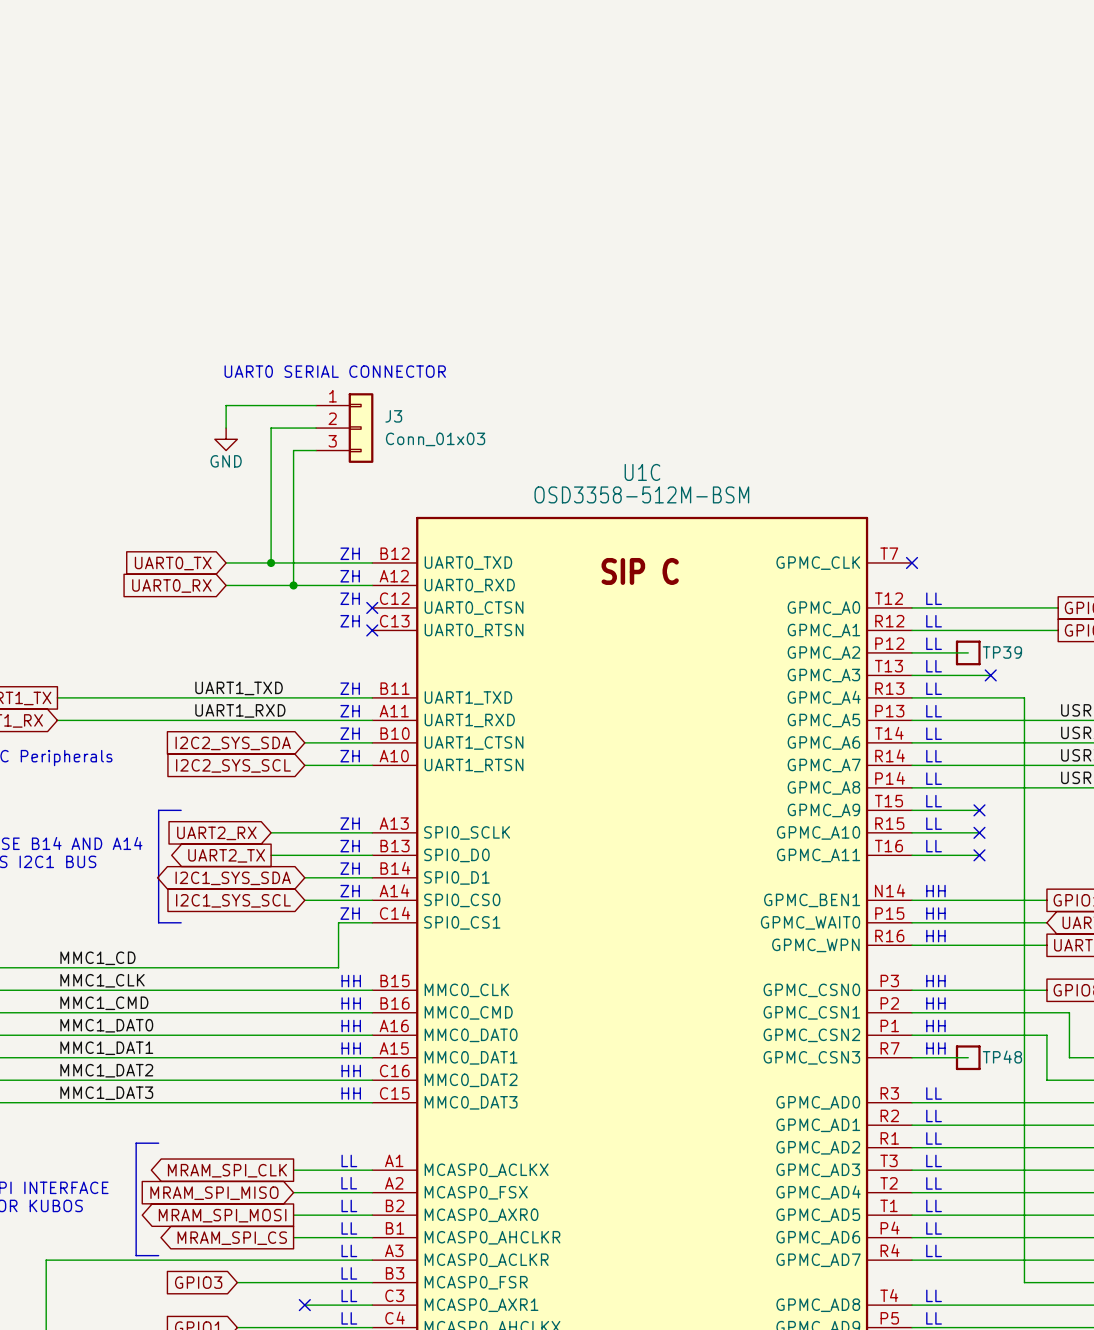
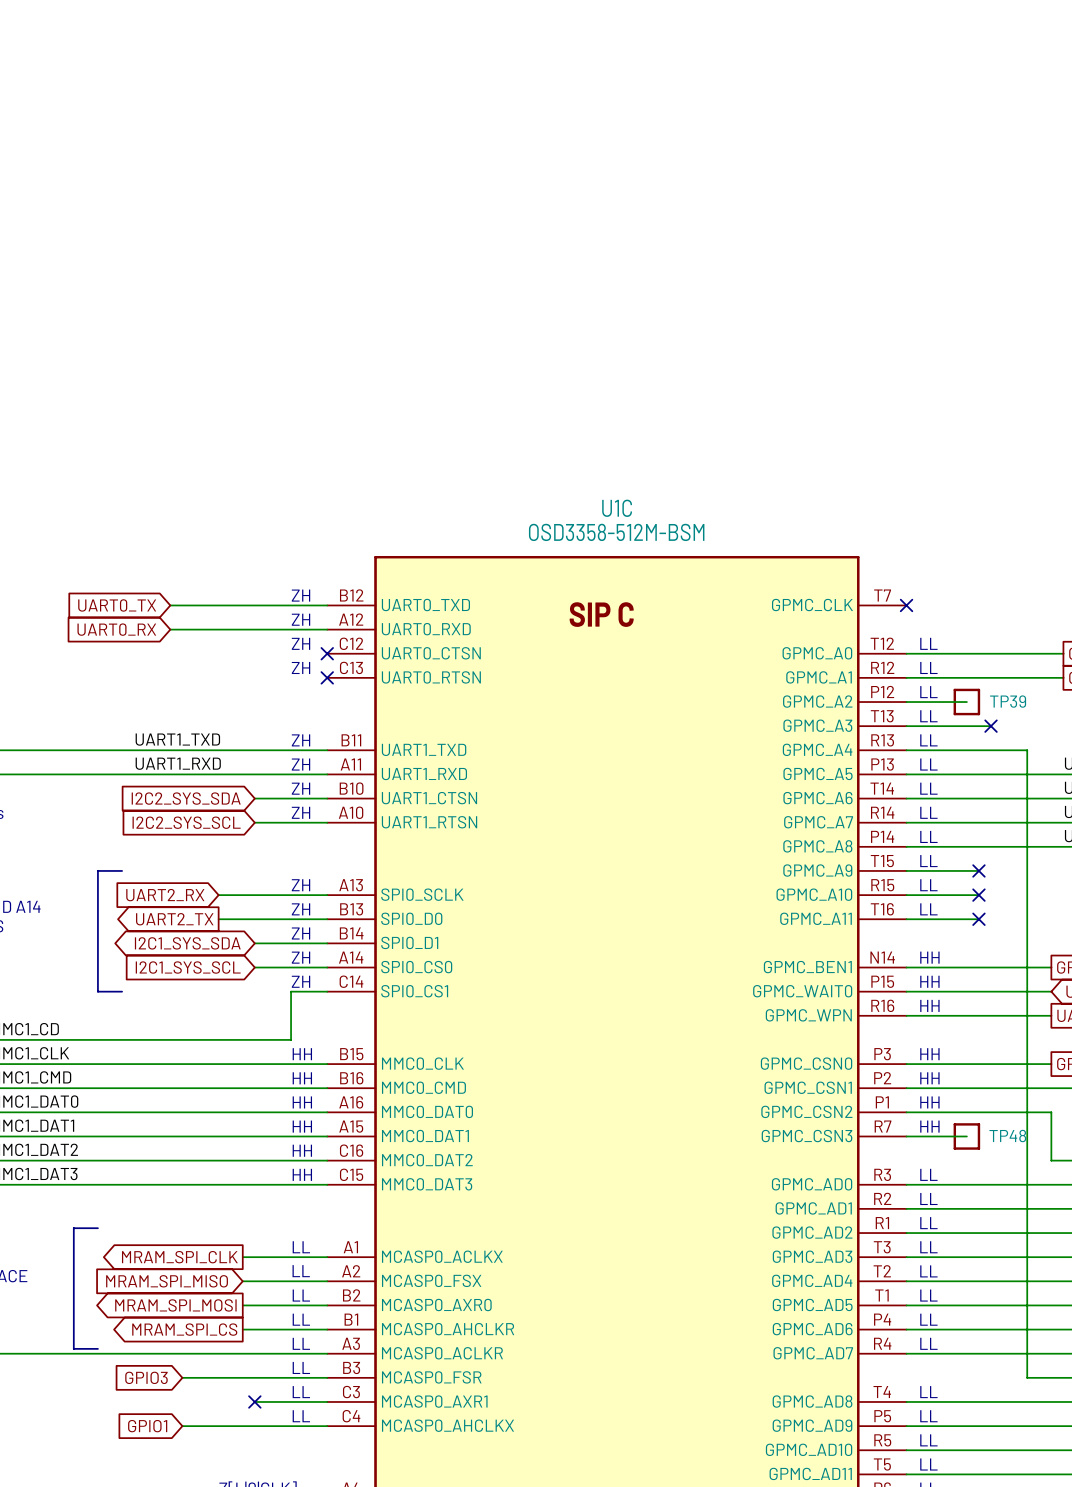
text: UART0 SERIAL CONNECTOR (335, 371) -> none
wire: (316, 405) (226, 405) (226, 428) -> none
wire: (316, 428) (271, 428) (271, 562) -> none
J3: Conn_01x03 (344, 428) -> none
power symbol: GND (226, 439) -> none
wire: (316, 450) (293, 450) (293, 585) -> none
junction: (271, 562) -> none
junction: (293, 585) -> none

